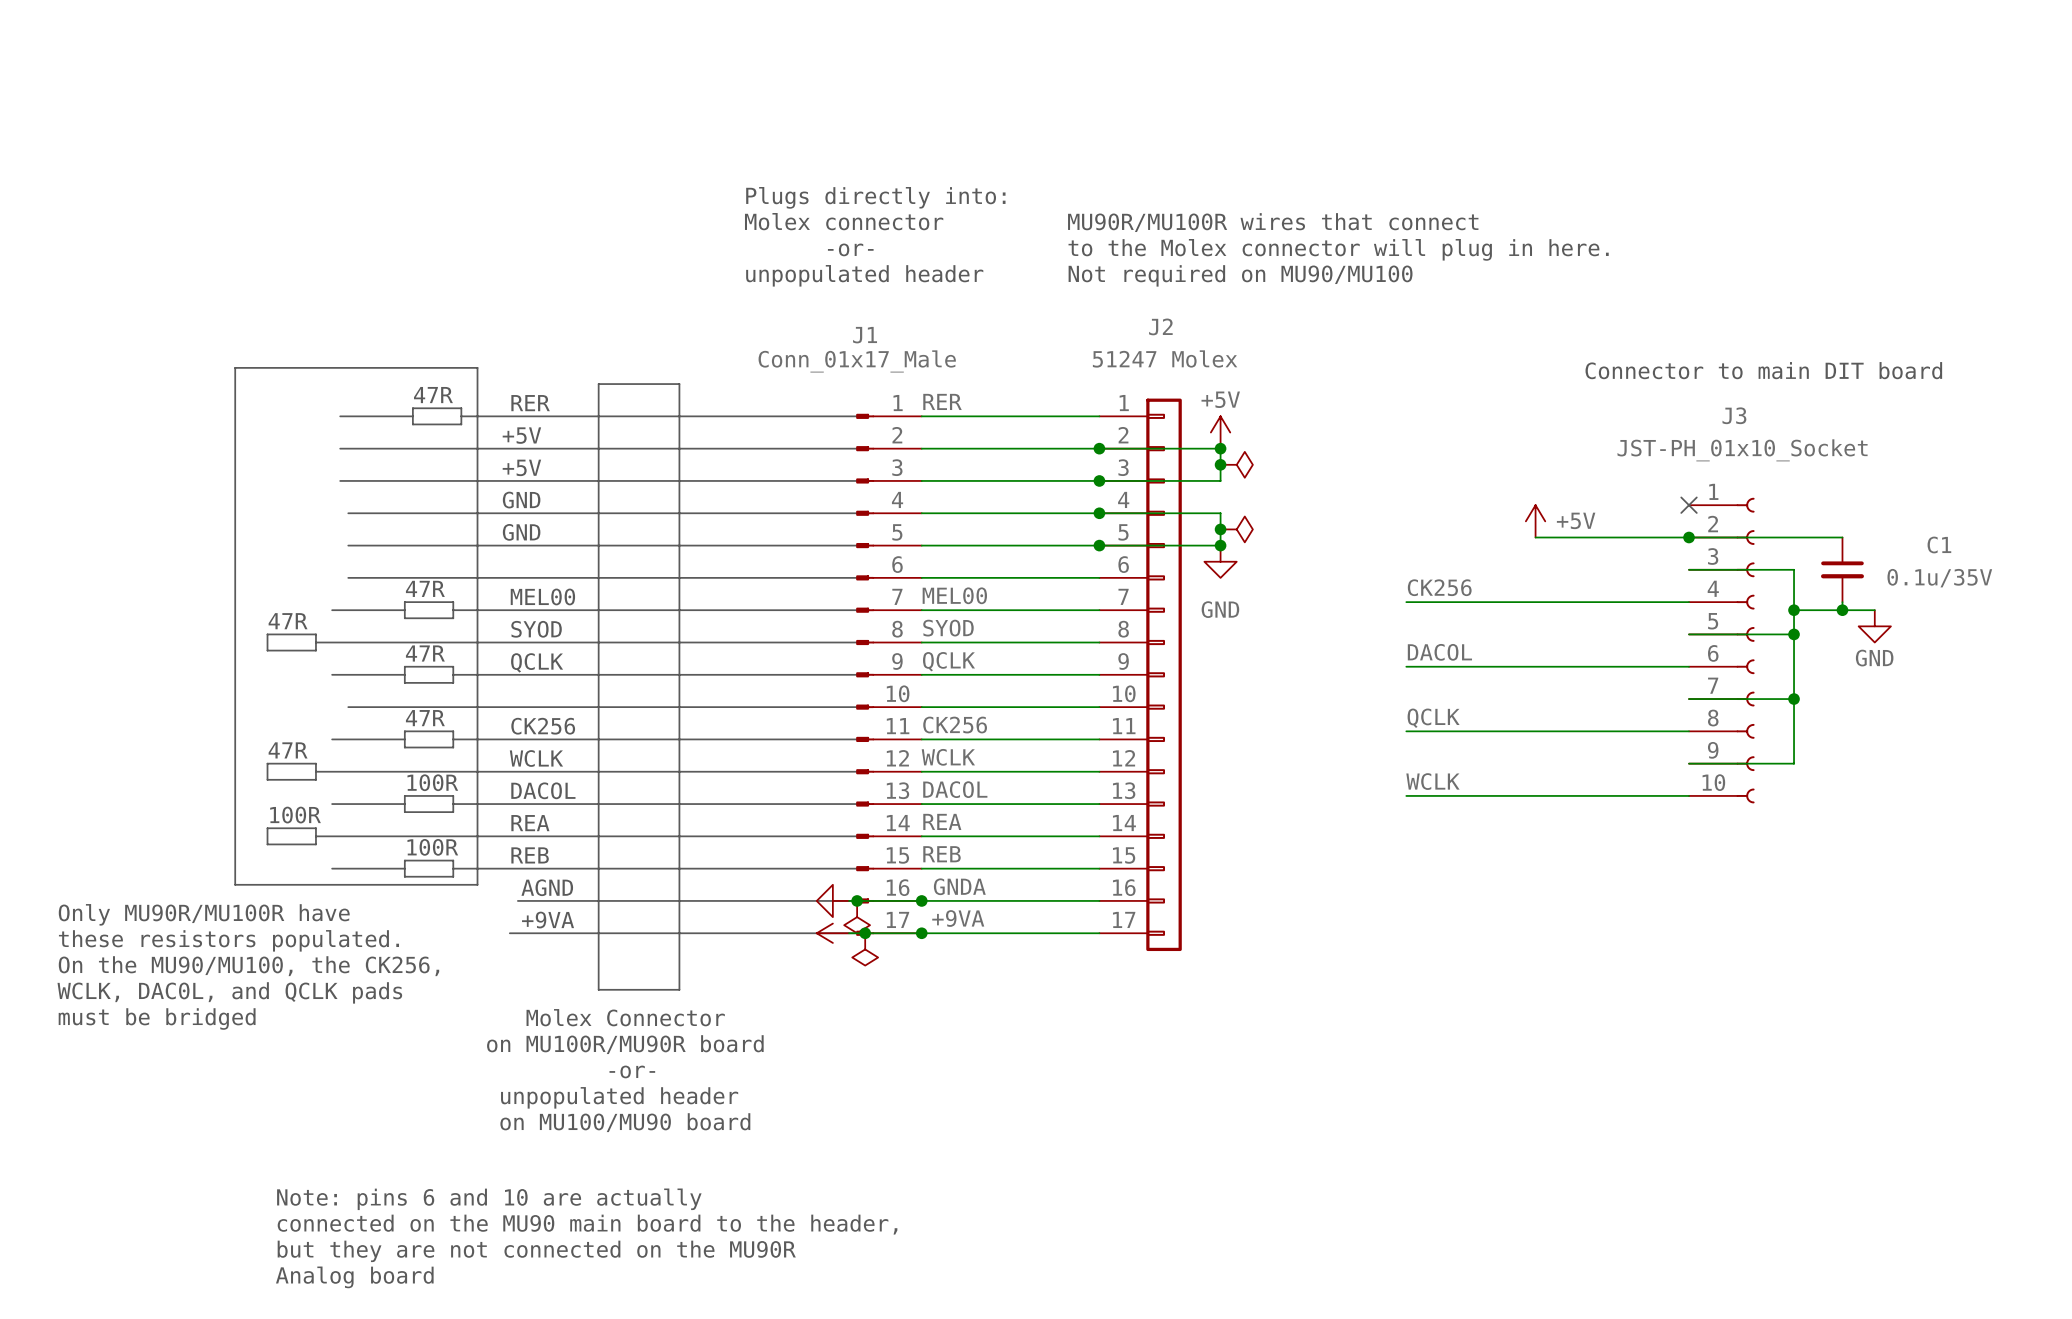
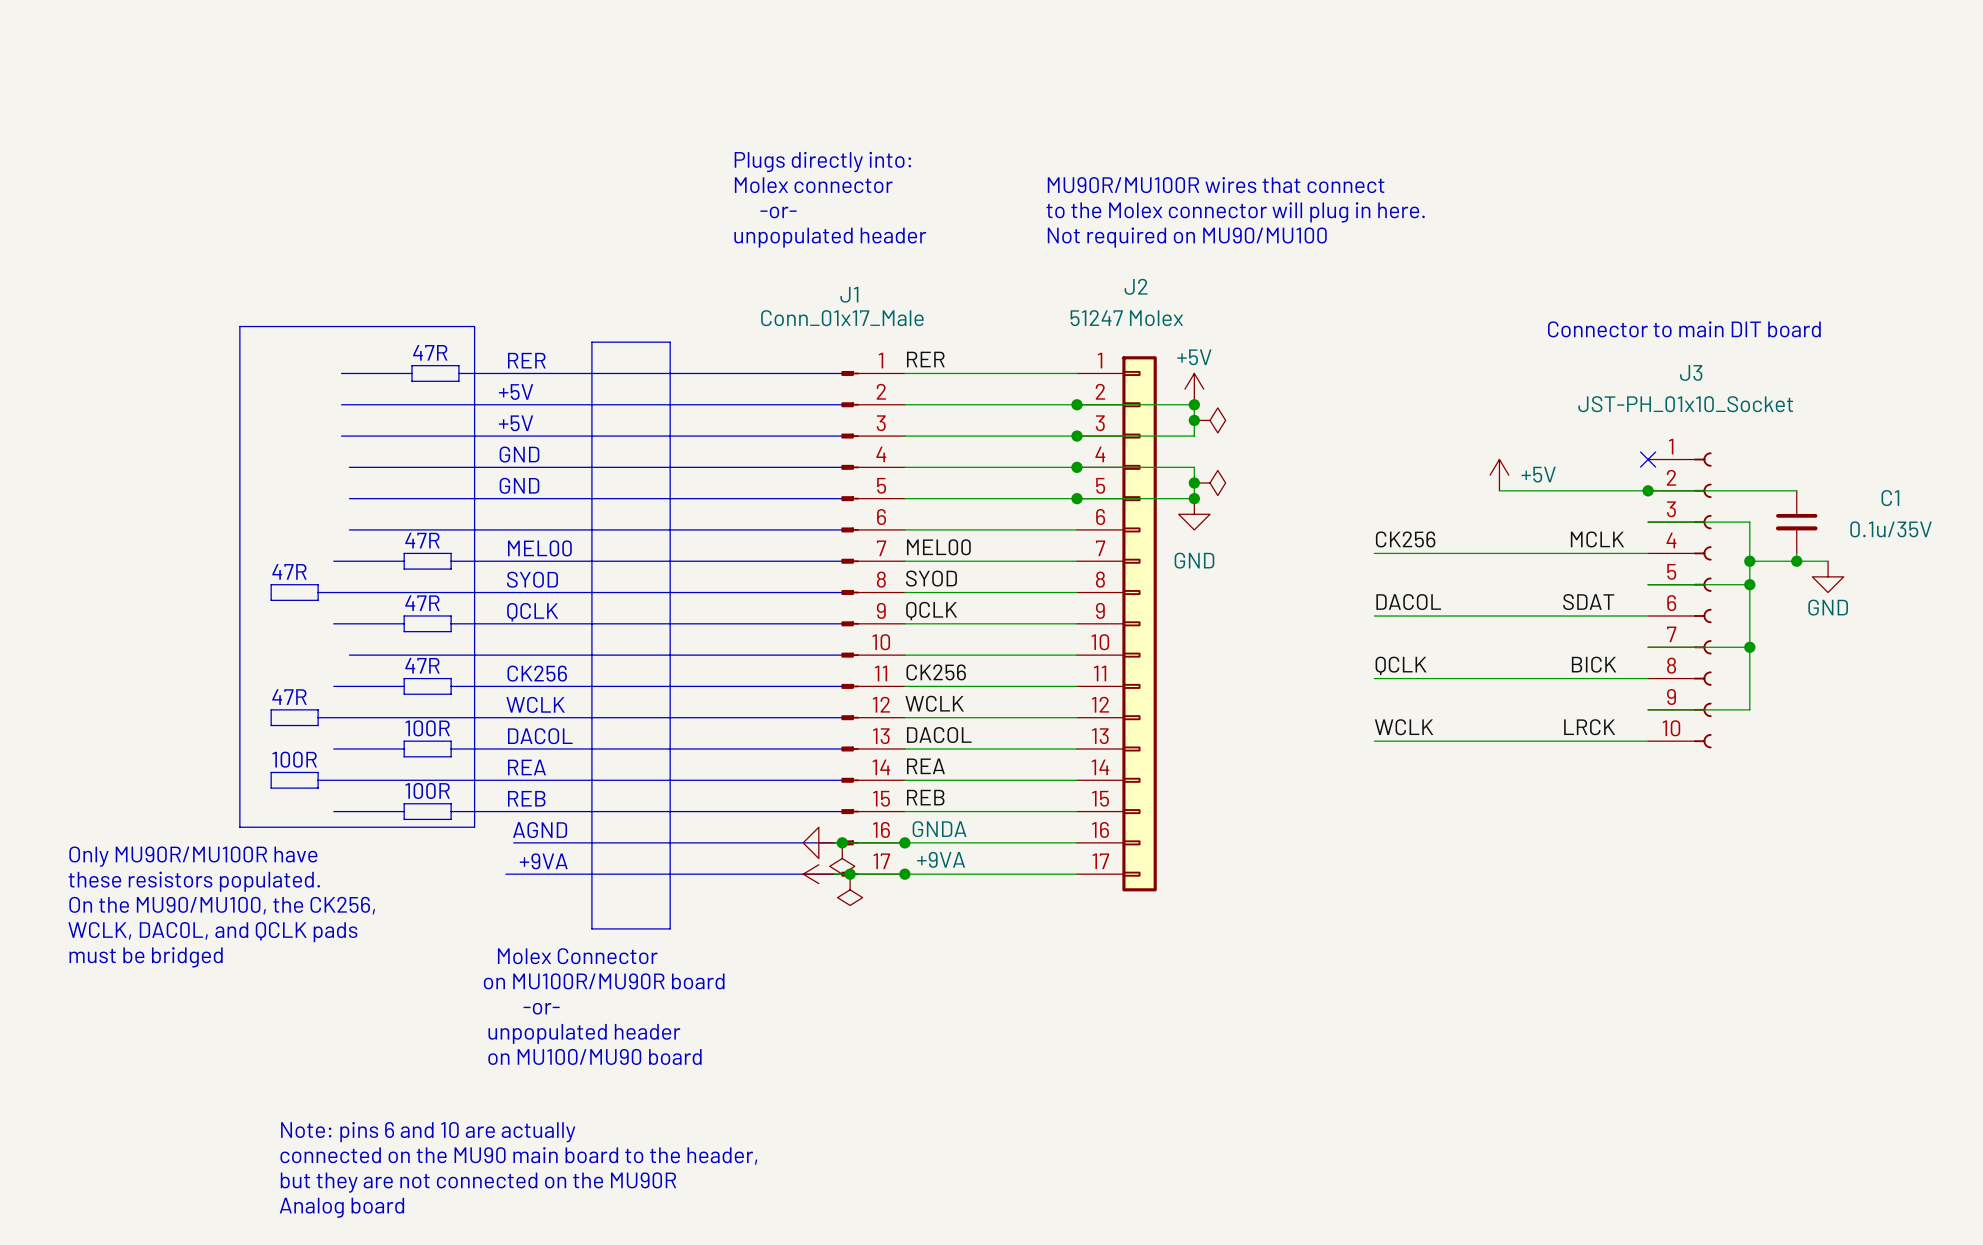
label: none -> MCLK (1597, 539)
label: none -> SDAT (1588, 602)
label: none -> BICK (1594, 664)
label: none -> LRCK (1589, 727)

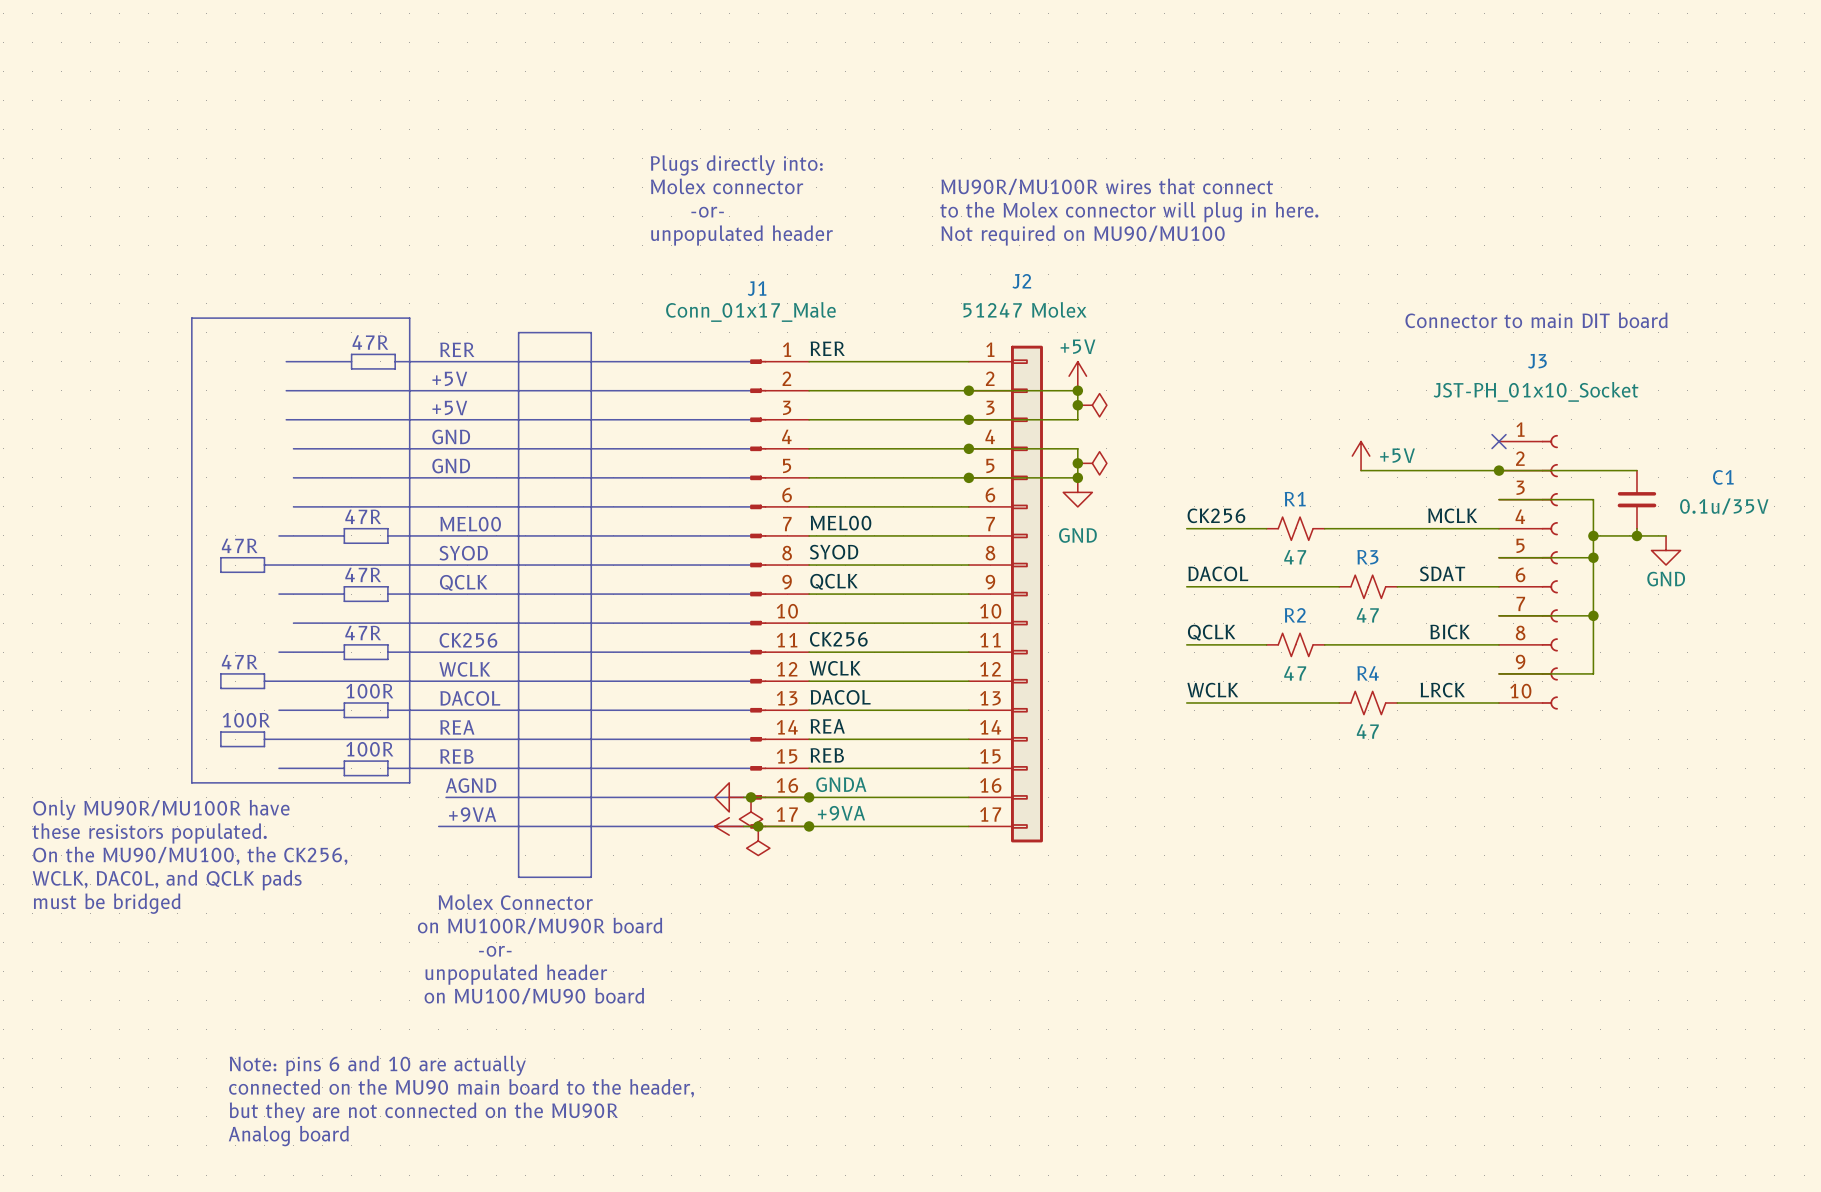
label position: CK256 (1405, 539) -> CK256 (1216, 515)
wire: (1397, 553) (1460, 553) -> (1186, 528) (1244, 528)
R1: none -> 47 (1295, 528)
label position: DACOL (1408, 602) -> DACOL (1218, 573)
wire: (1475, 615) (1538, 615) -> (1186, 586) (1244, 586)
R3: none -> 47 (1368, 586)
label position: QCLK (1401, 665) -> QCLK (1211, 632)
wire: (1397, 678) (1460, 678) -> (1186, 644) (1244, 644)
R2: none -> 47 (1295, 644)
label position: WCLK (1404, 727) -> WCLK (1212, 690)
wire: (1475, 741) (1538, 741) -> (1186, 702) (1244, 702)
R4: none -> 47 (1368, 702)

